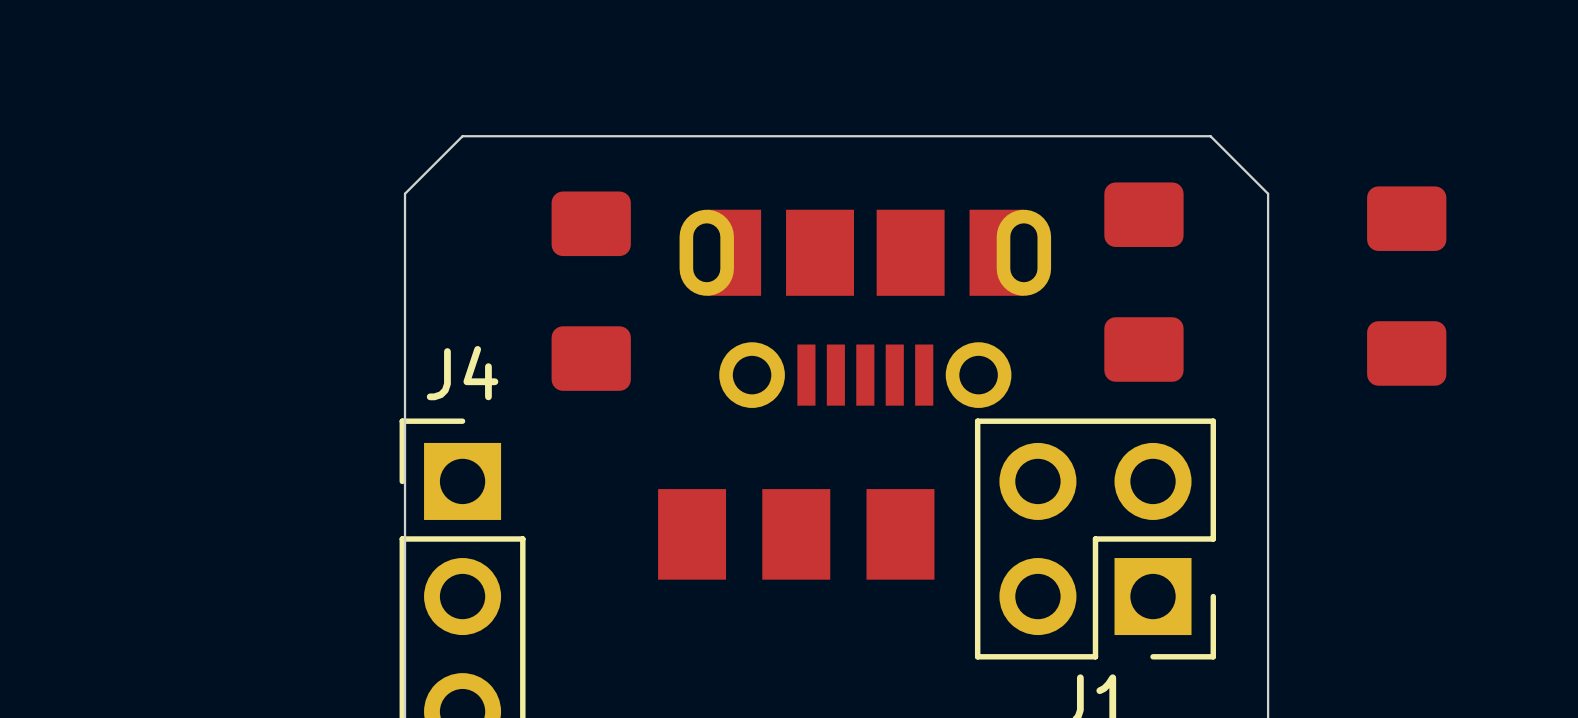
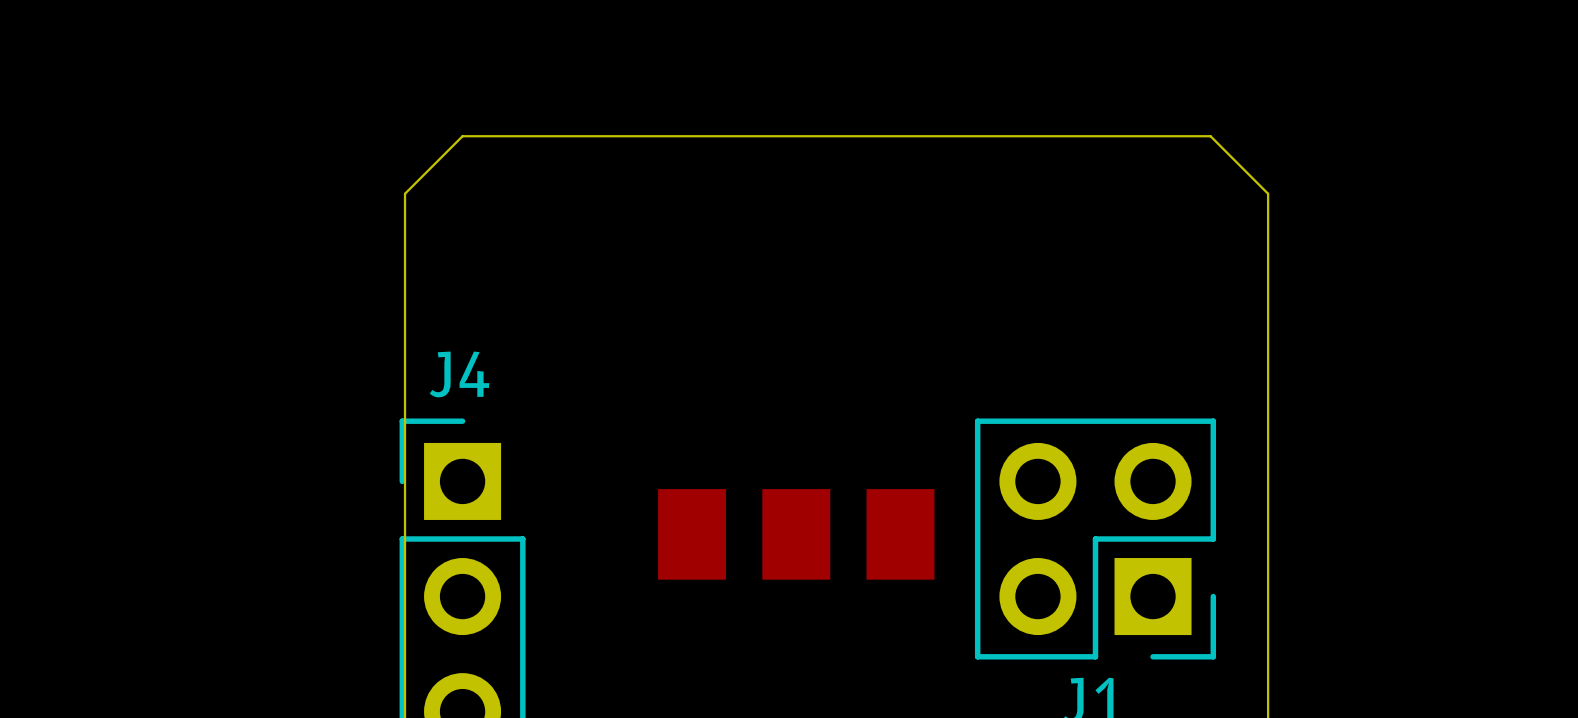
part: (1143, 282) -> none
part: (1406, 286) -> none
part: (591, 291) -> none
part: (865, 308) -> none

